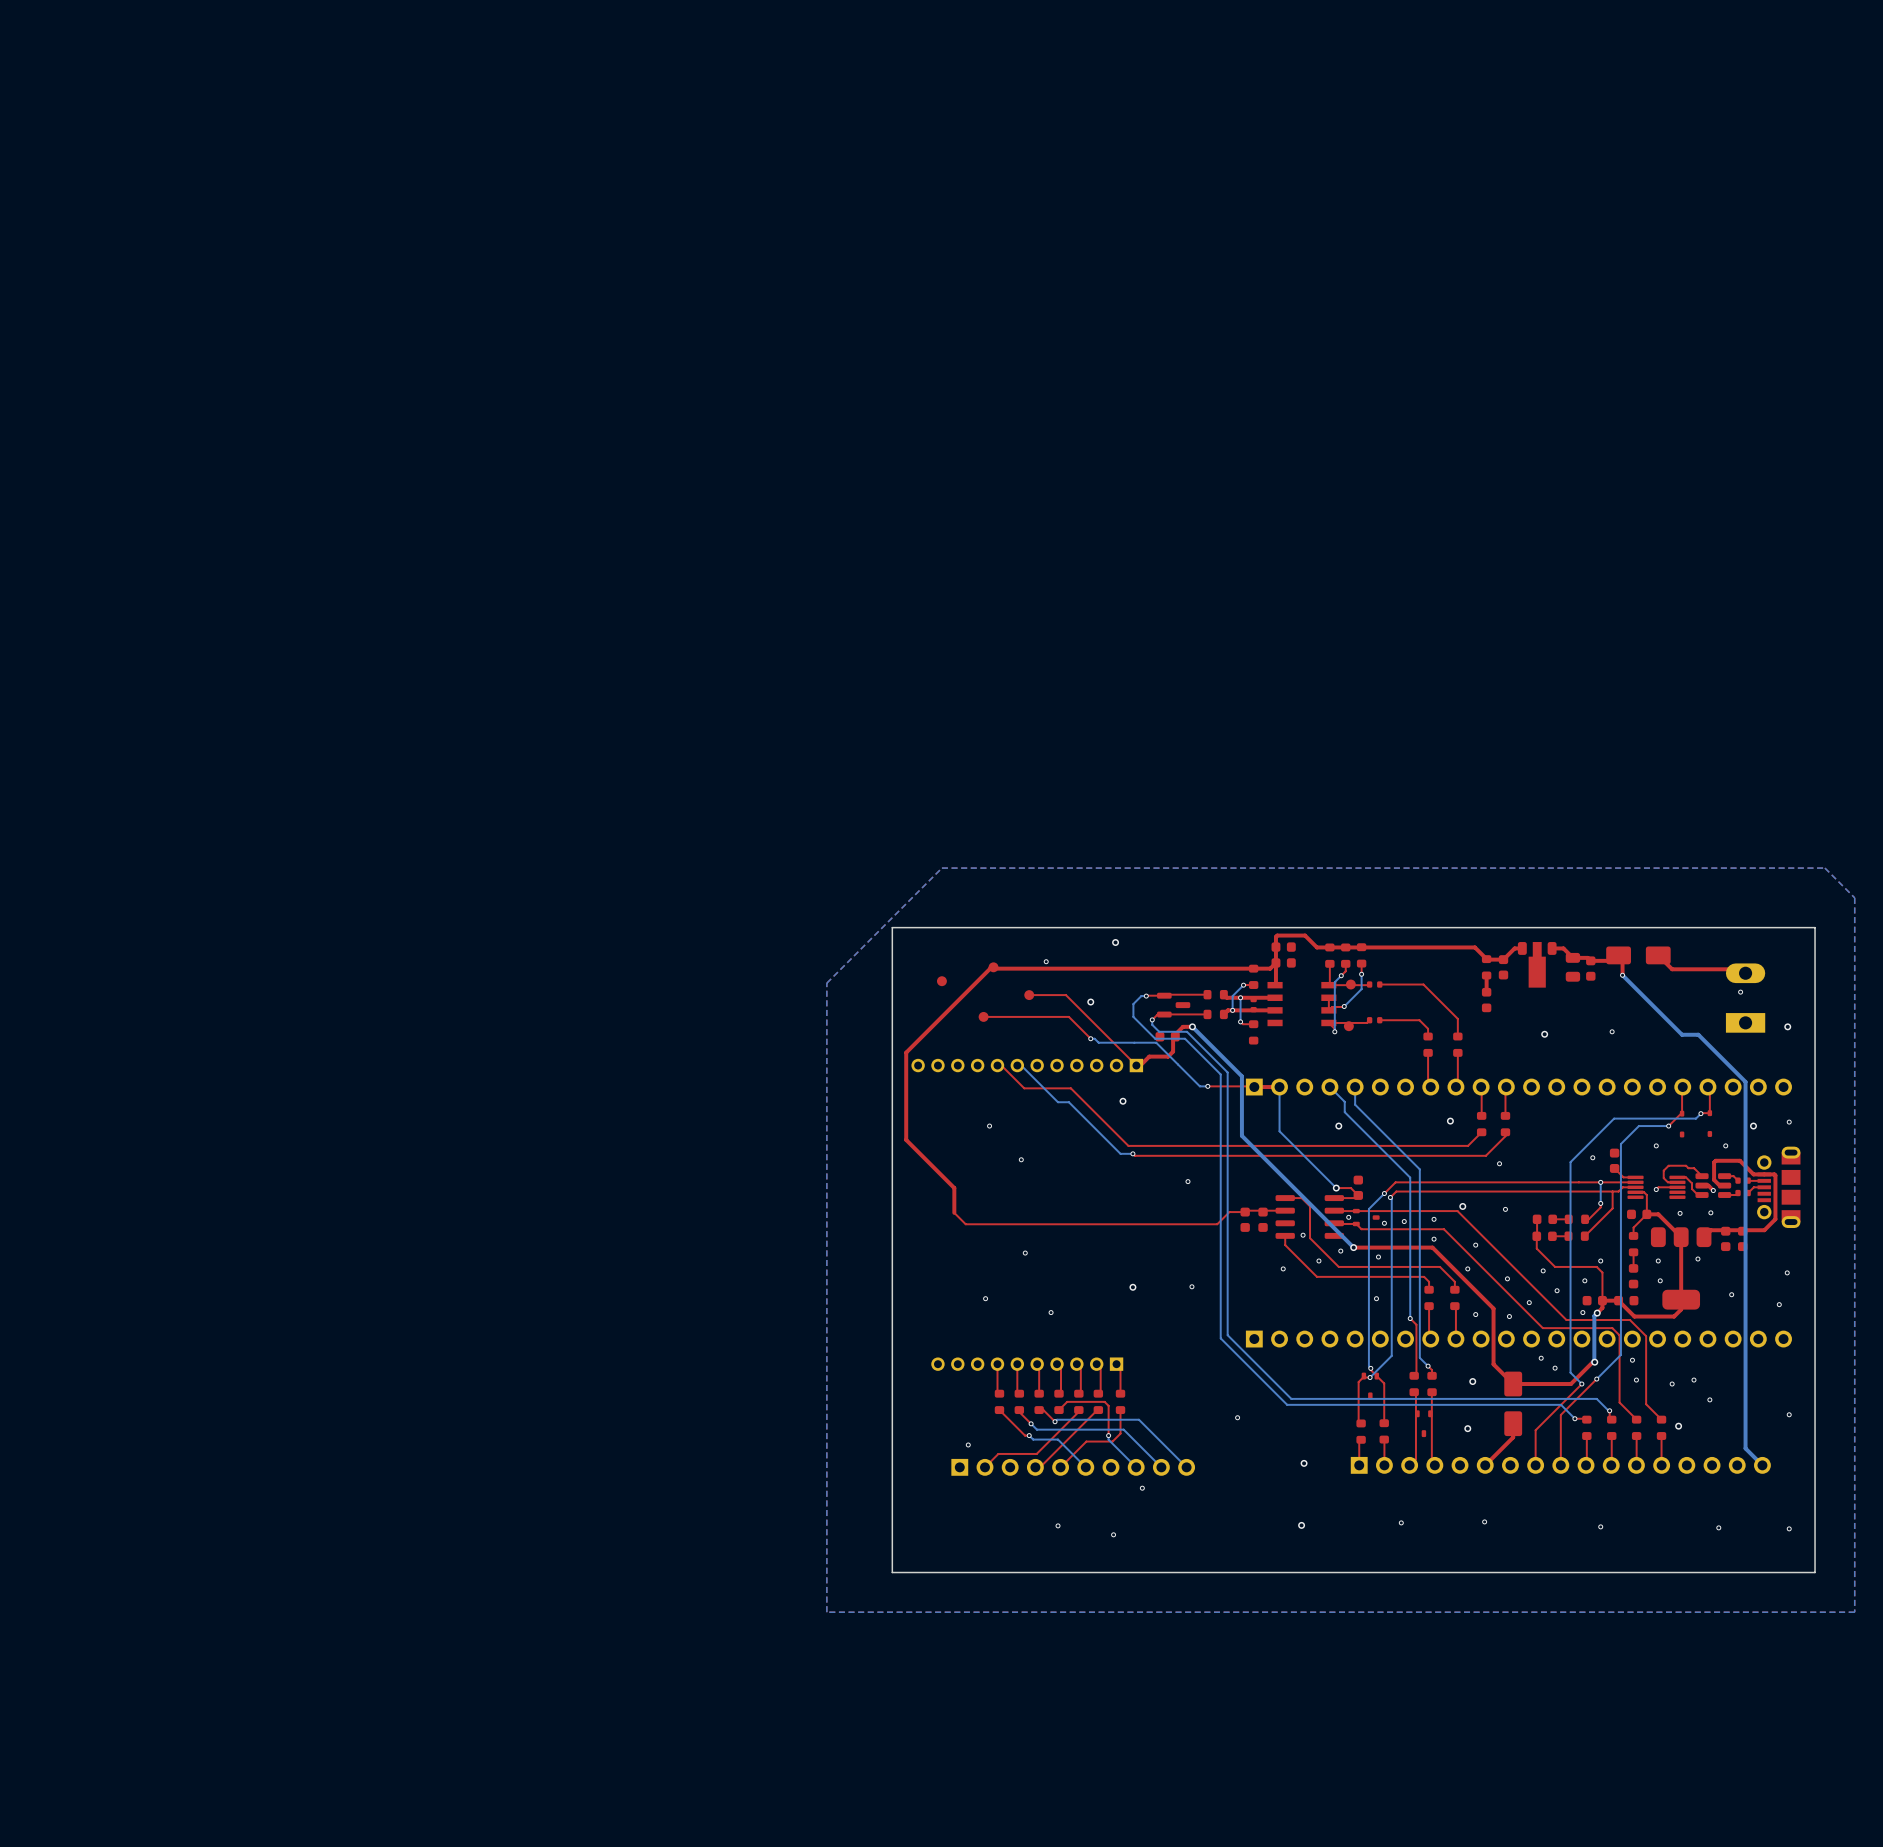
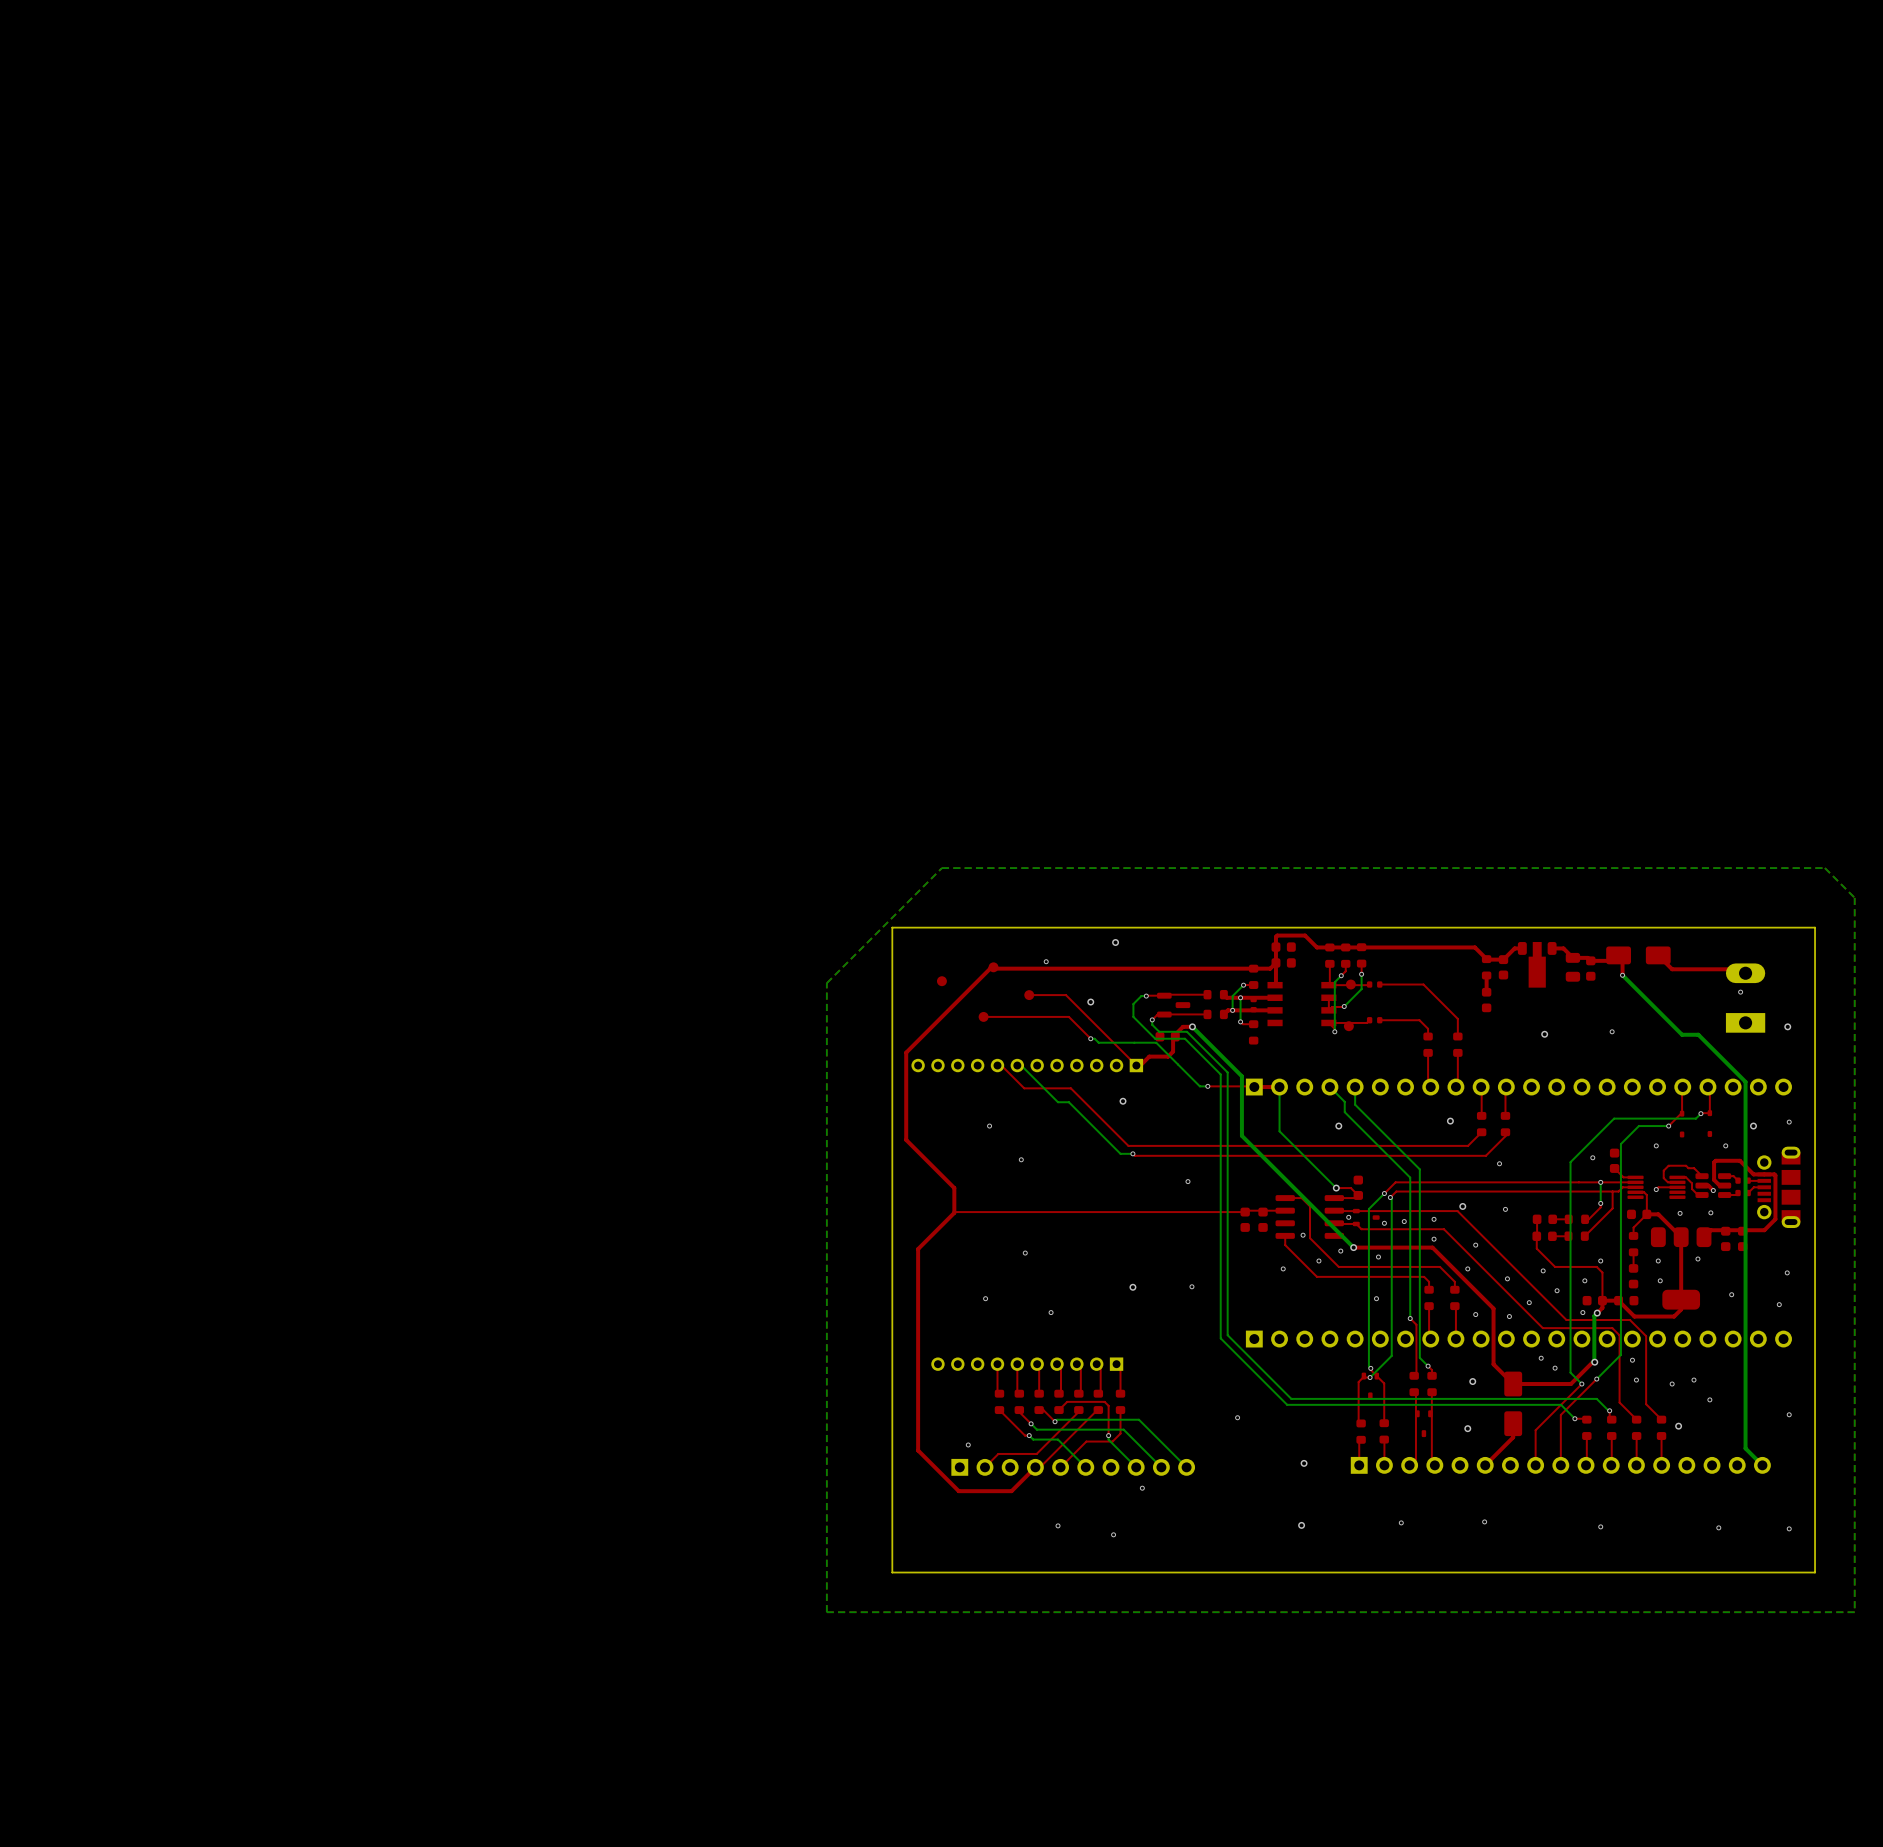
top track: (1229, 1212) (1217, 1224) (965, 1224) (954, 1212) -> (1229, 1212) (955, 1212) (918, 1249) (918, 1450) (958, 1491) (1011, 1491) (1035, 1467)

